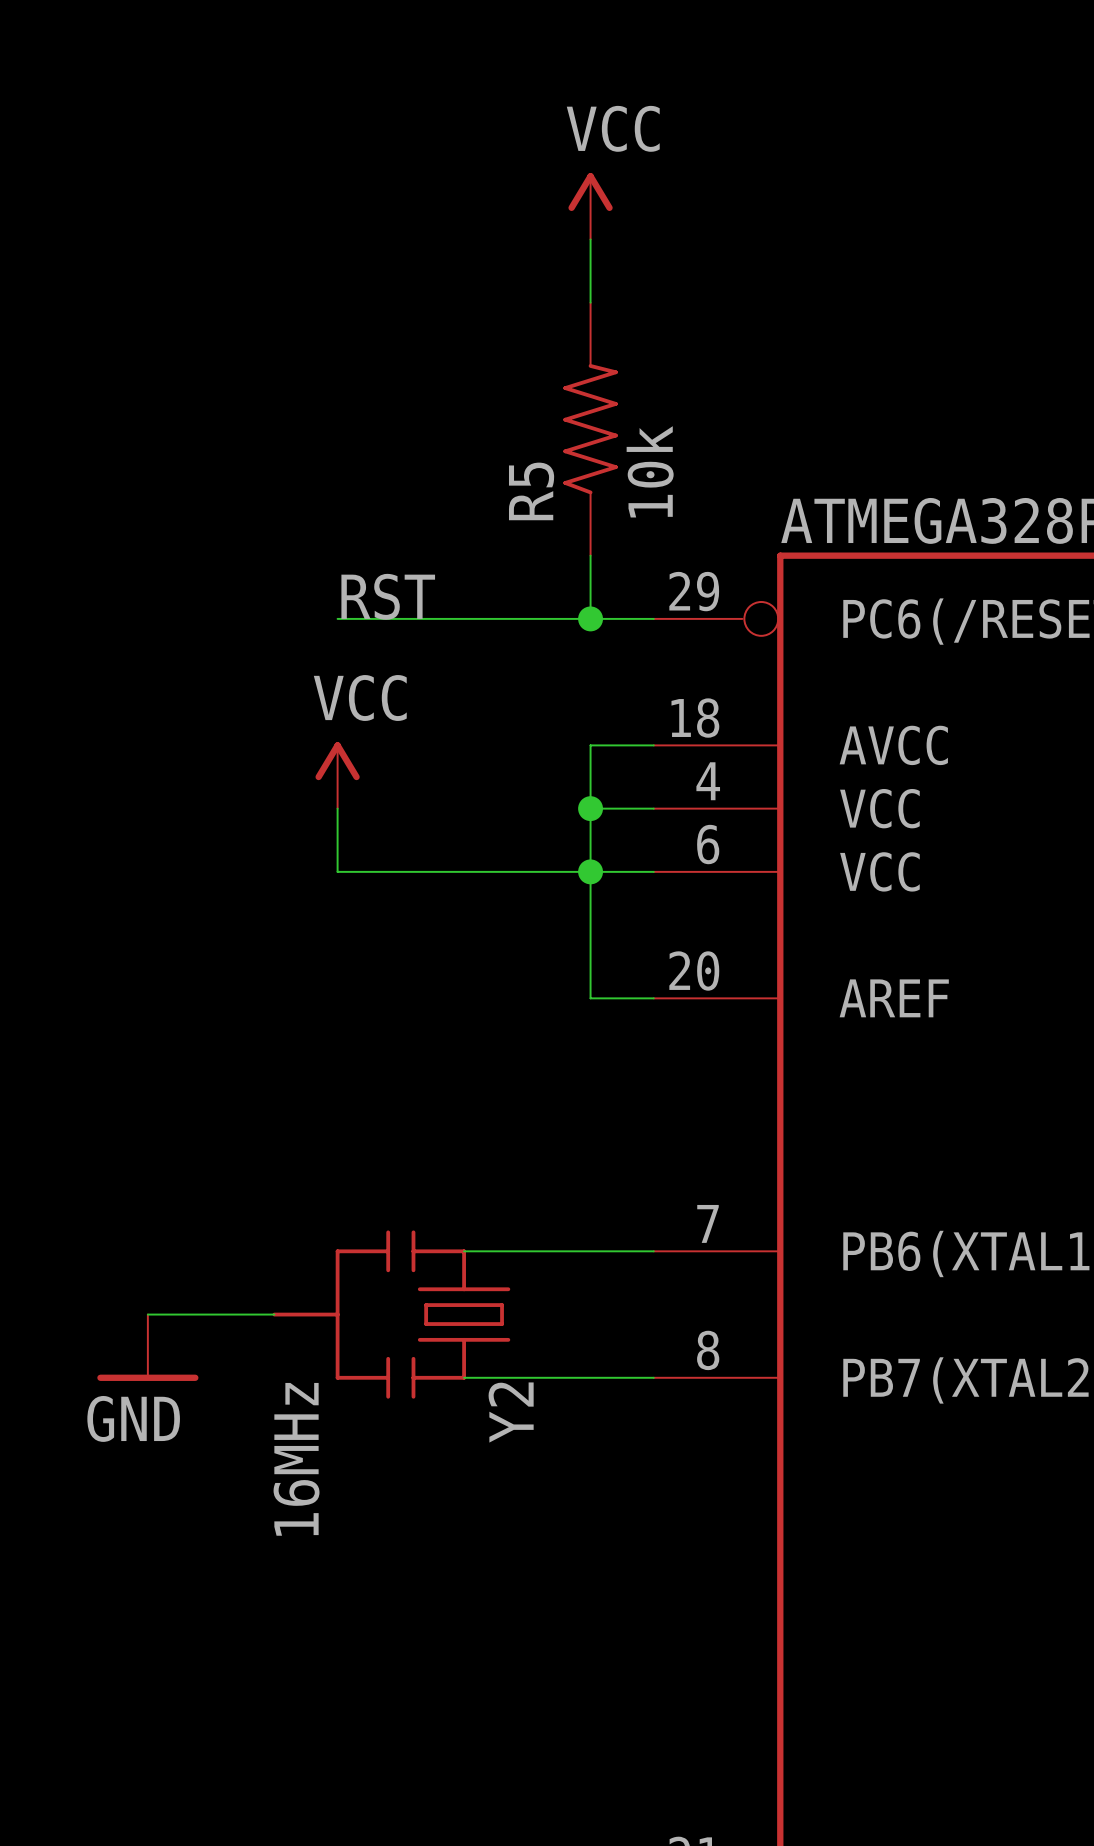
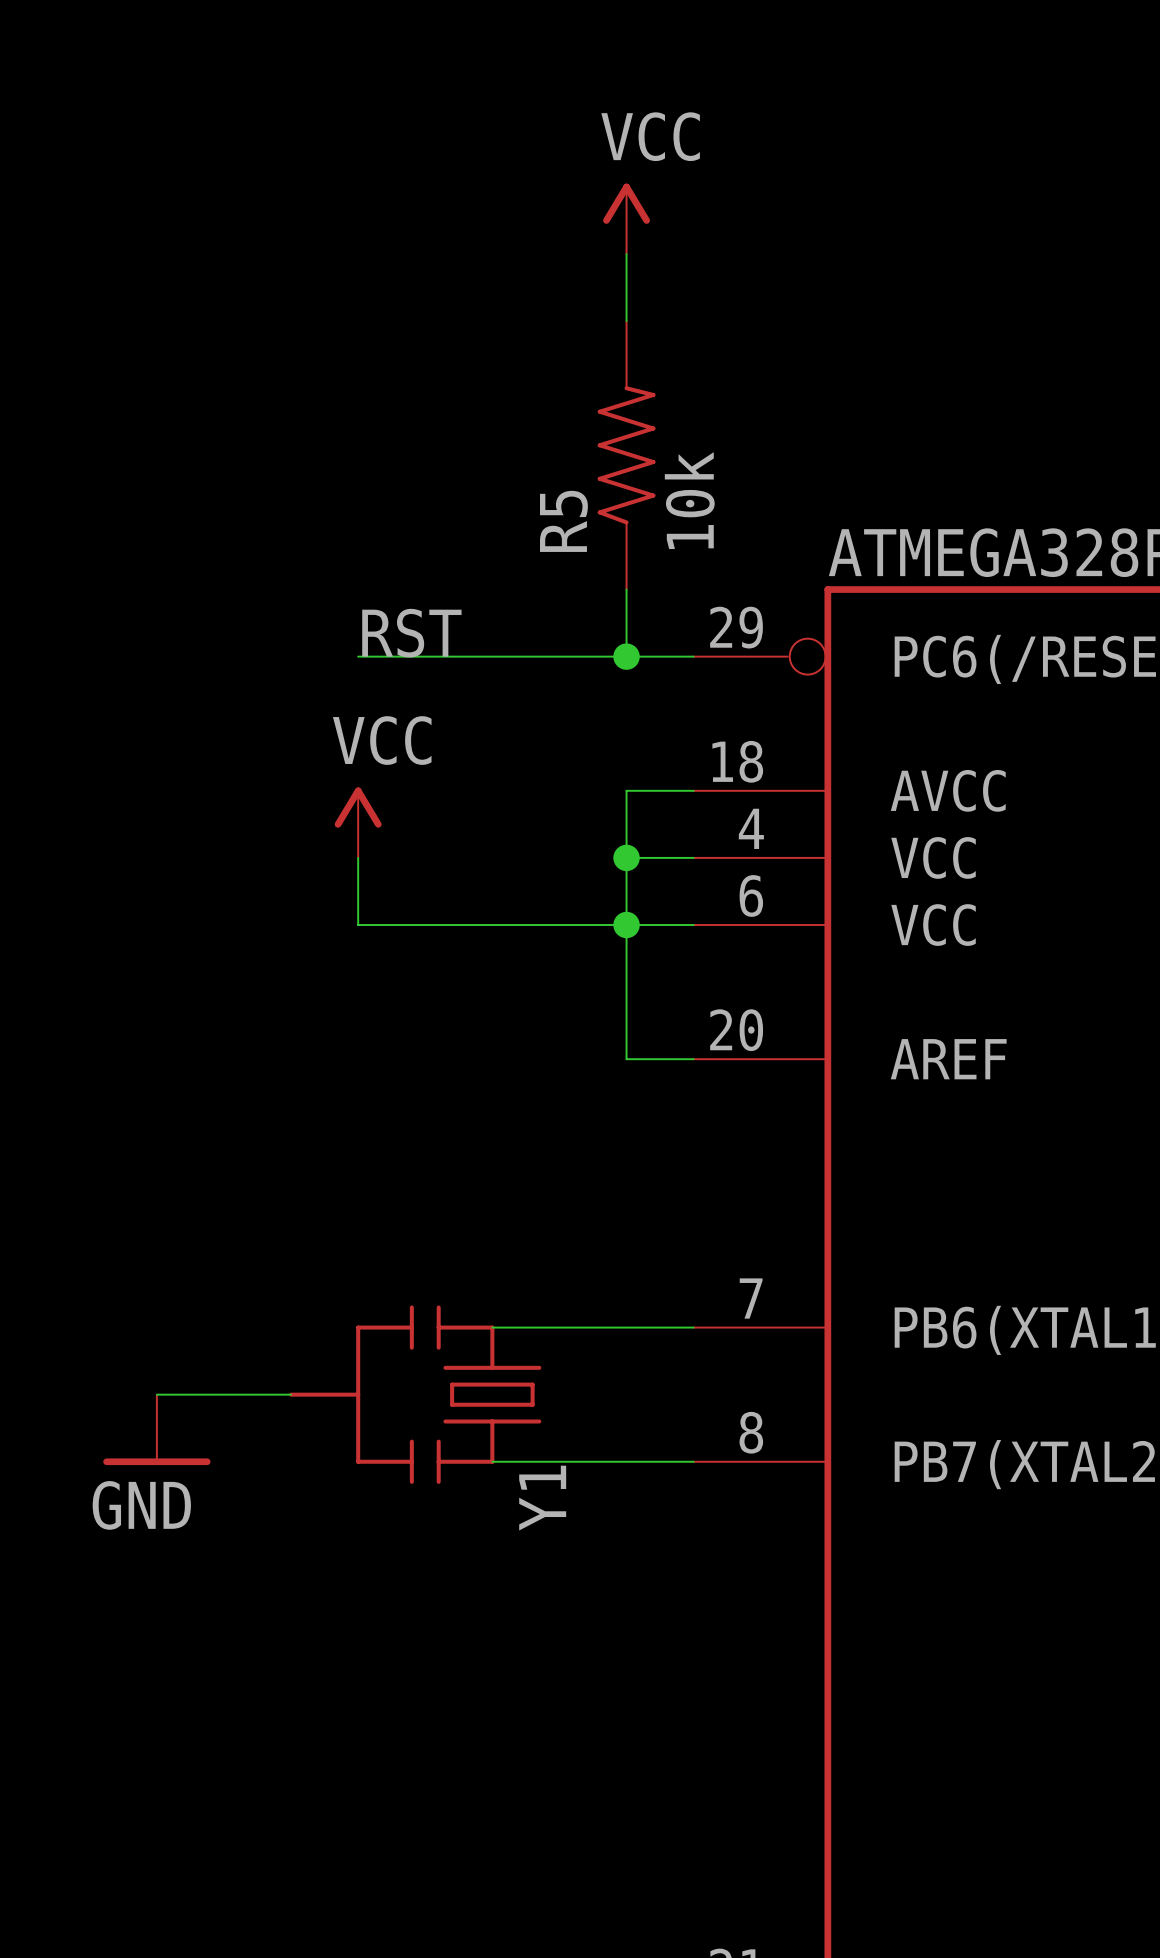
Y2 name: Y2 (511, 1412) -> Y1 (542, 1498)
Y2 value: 16MHz (296, 1459) -> none

